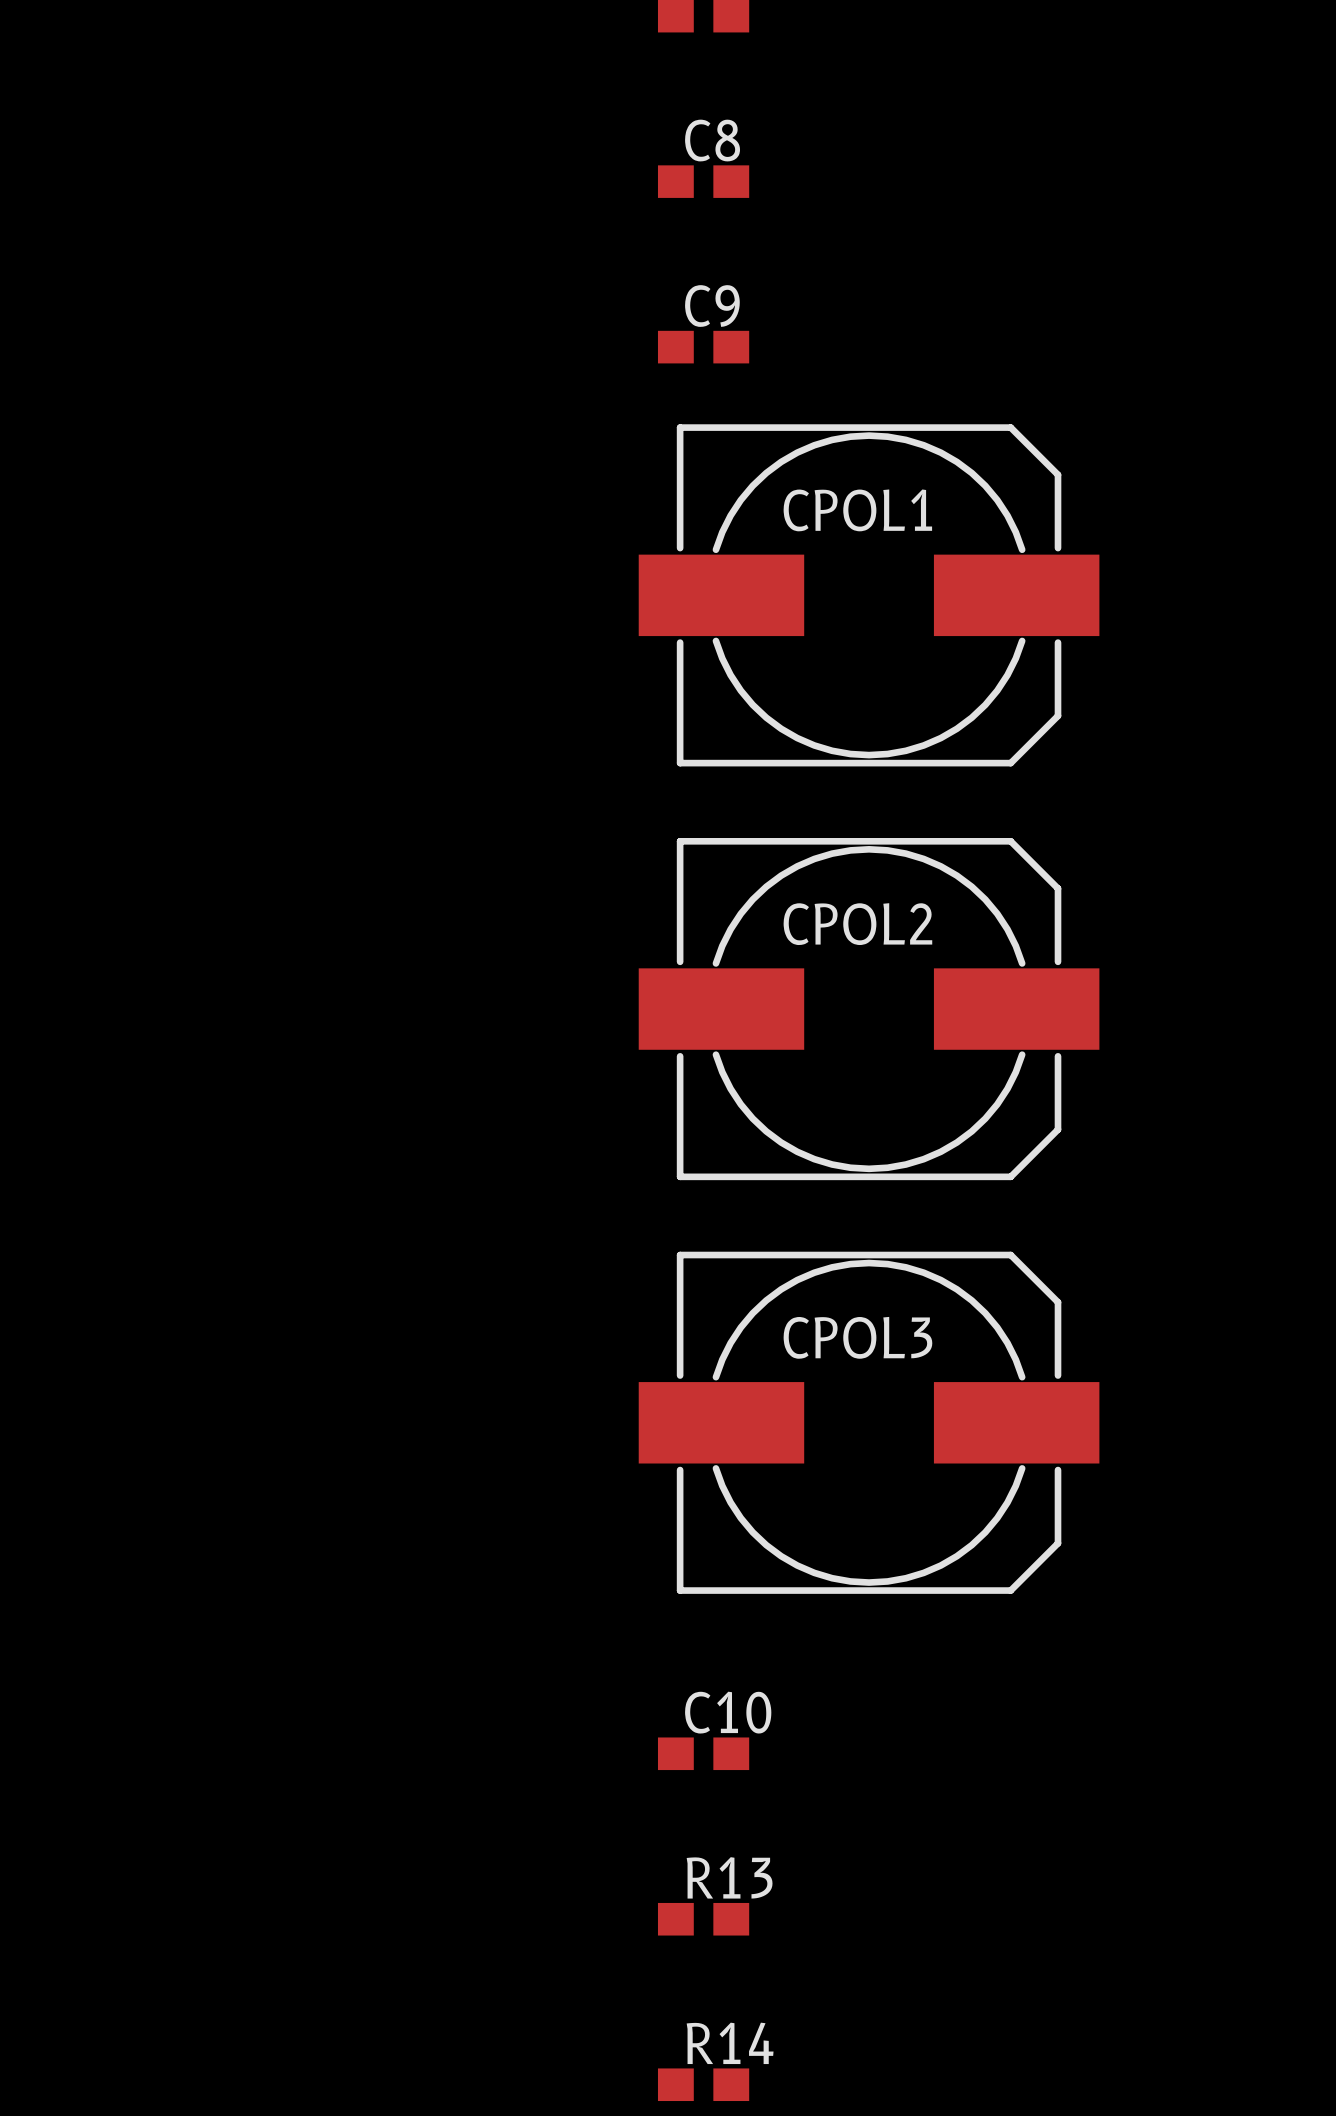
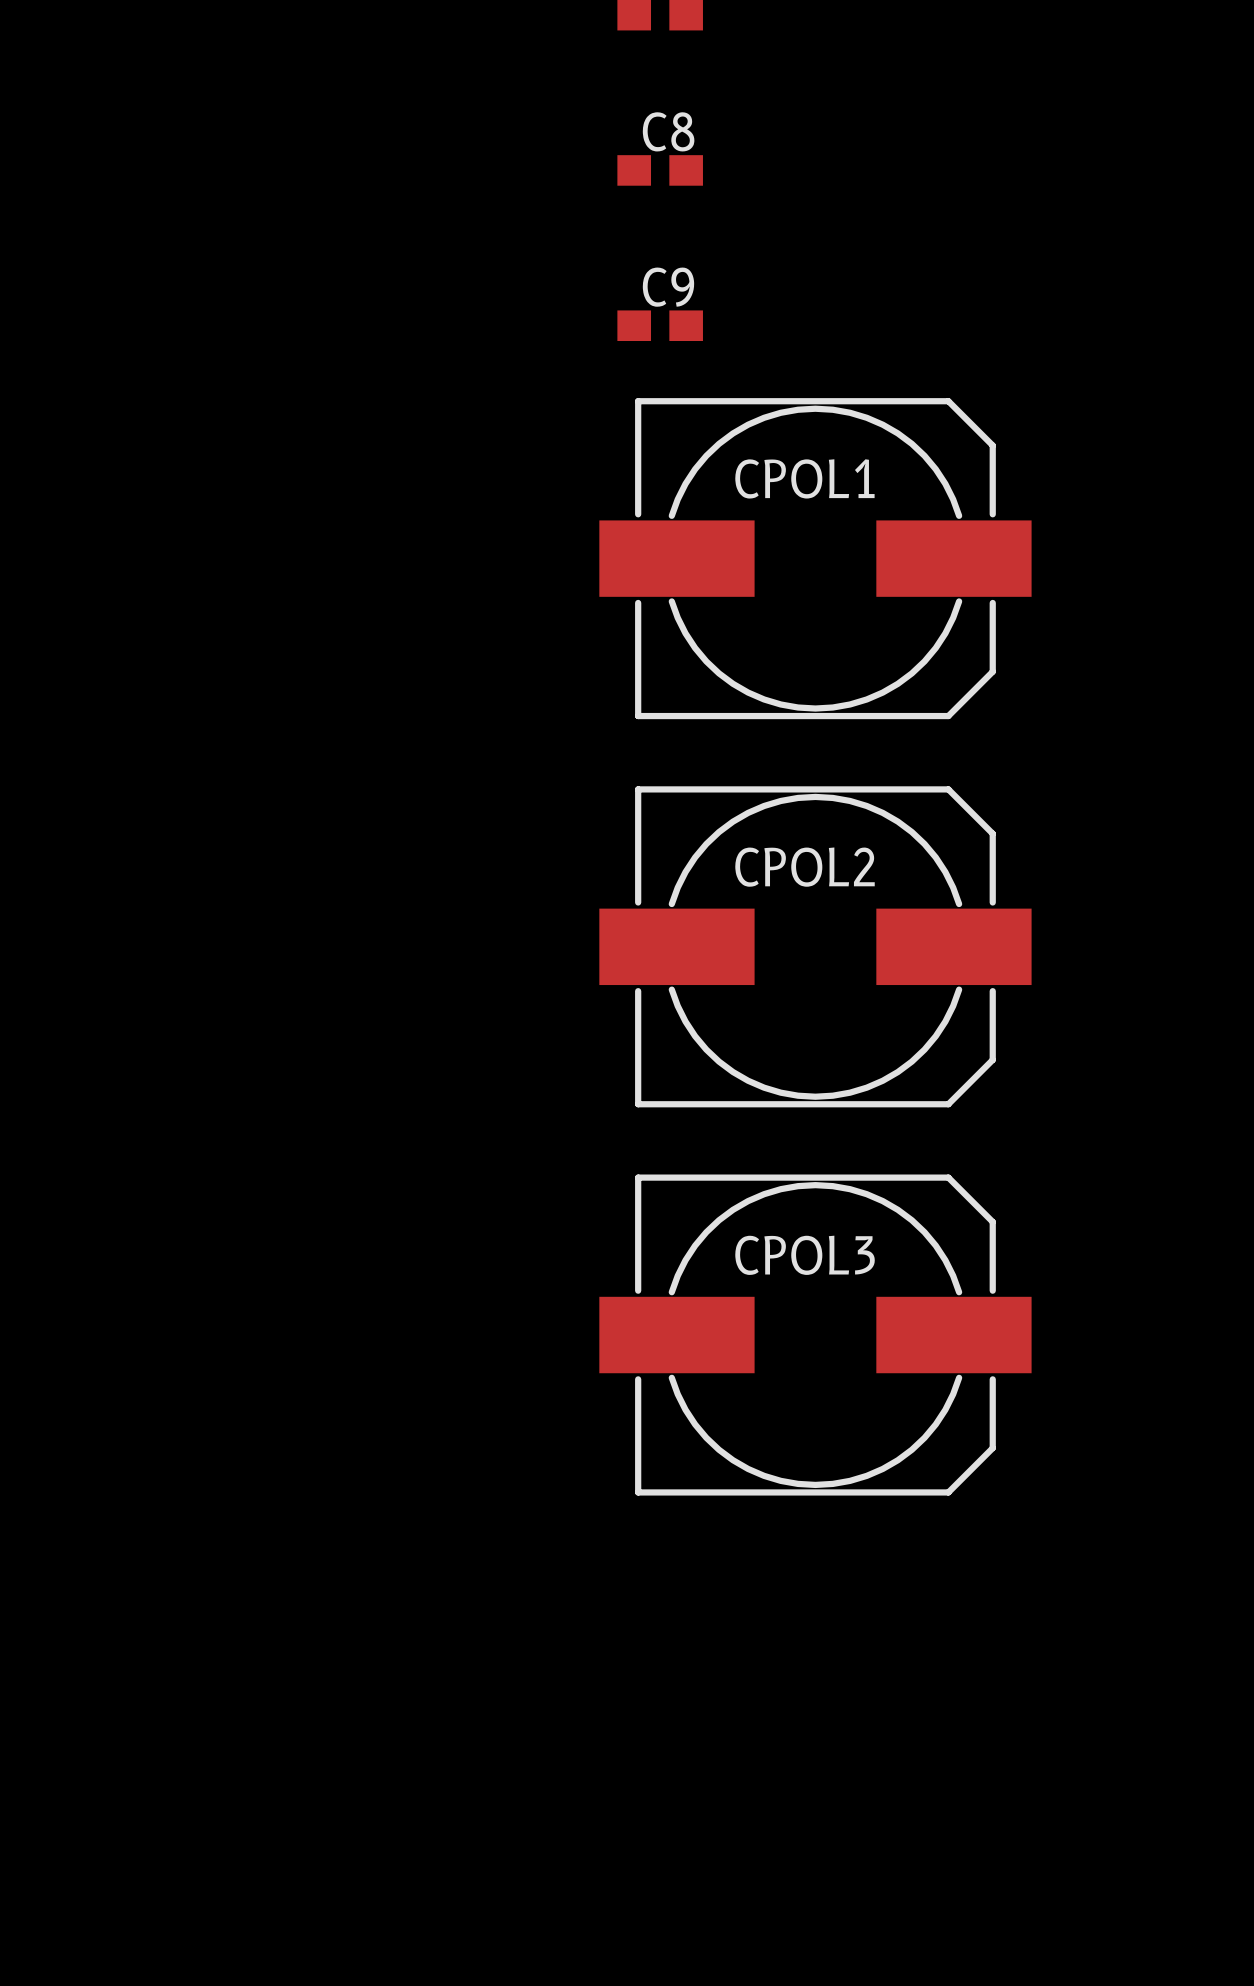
C10: (703, 1753) -> none
R13: (703, 1919) -> none
R14: (703, 2084) -> none

